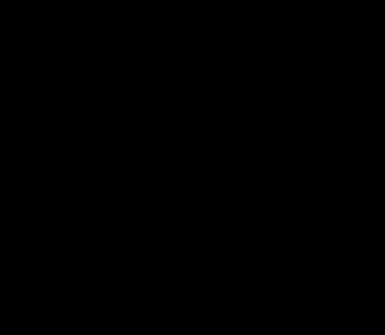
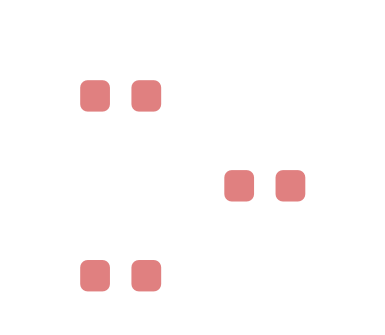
part: none -> (120, 95)
part: none -> (264, 185)
part: none -> (120, 275)

